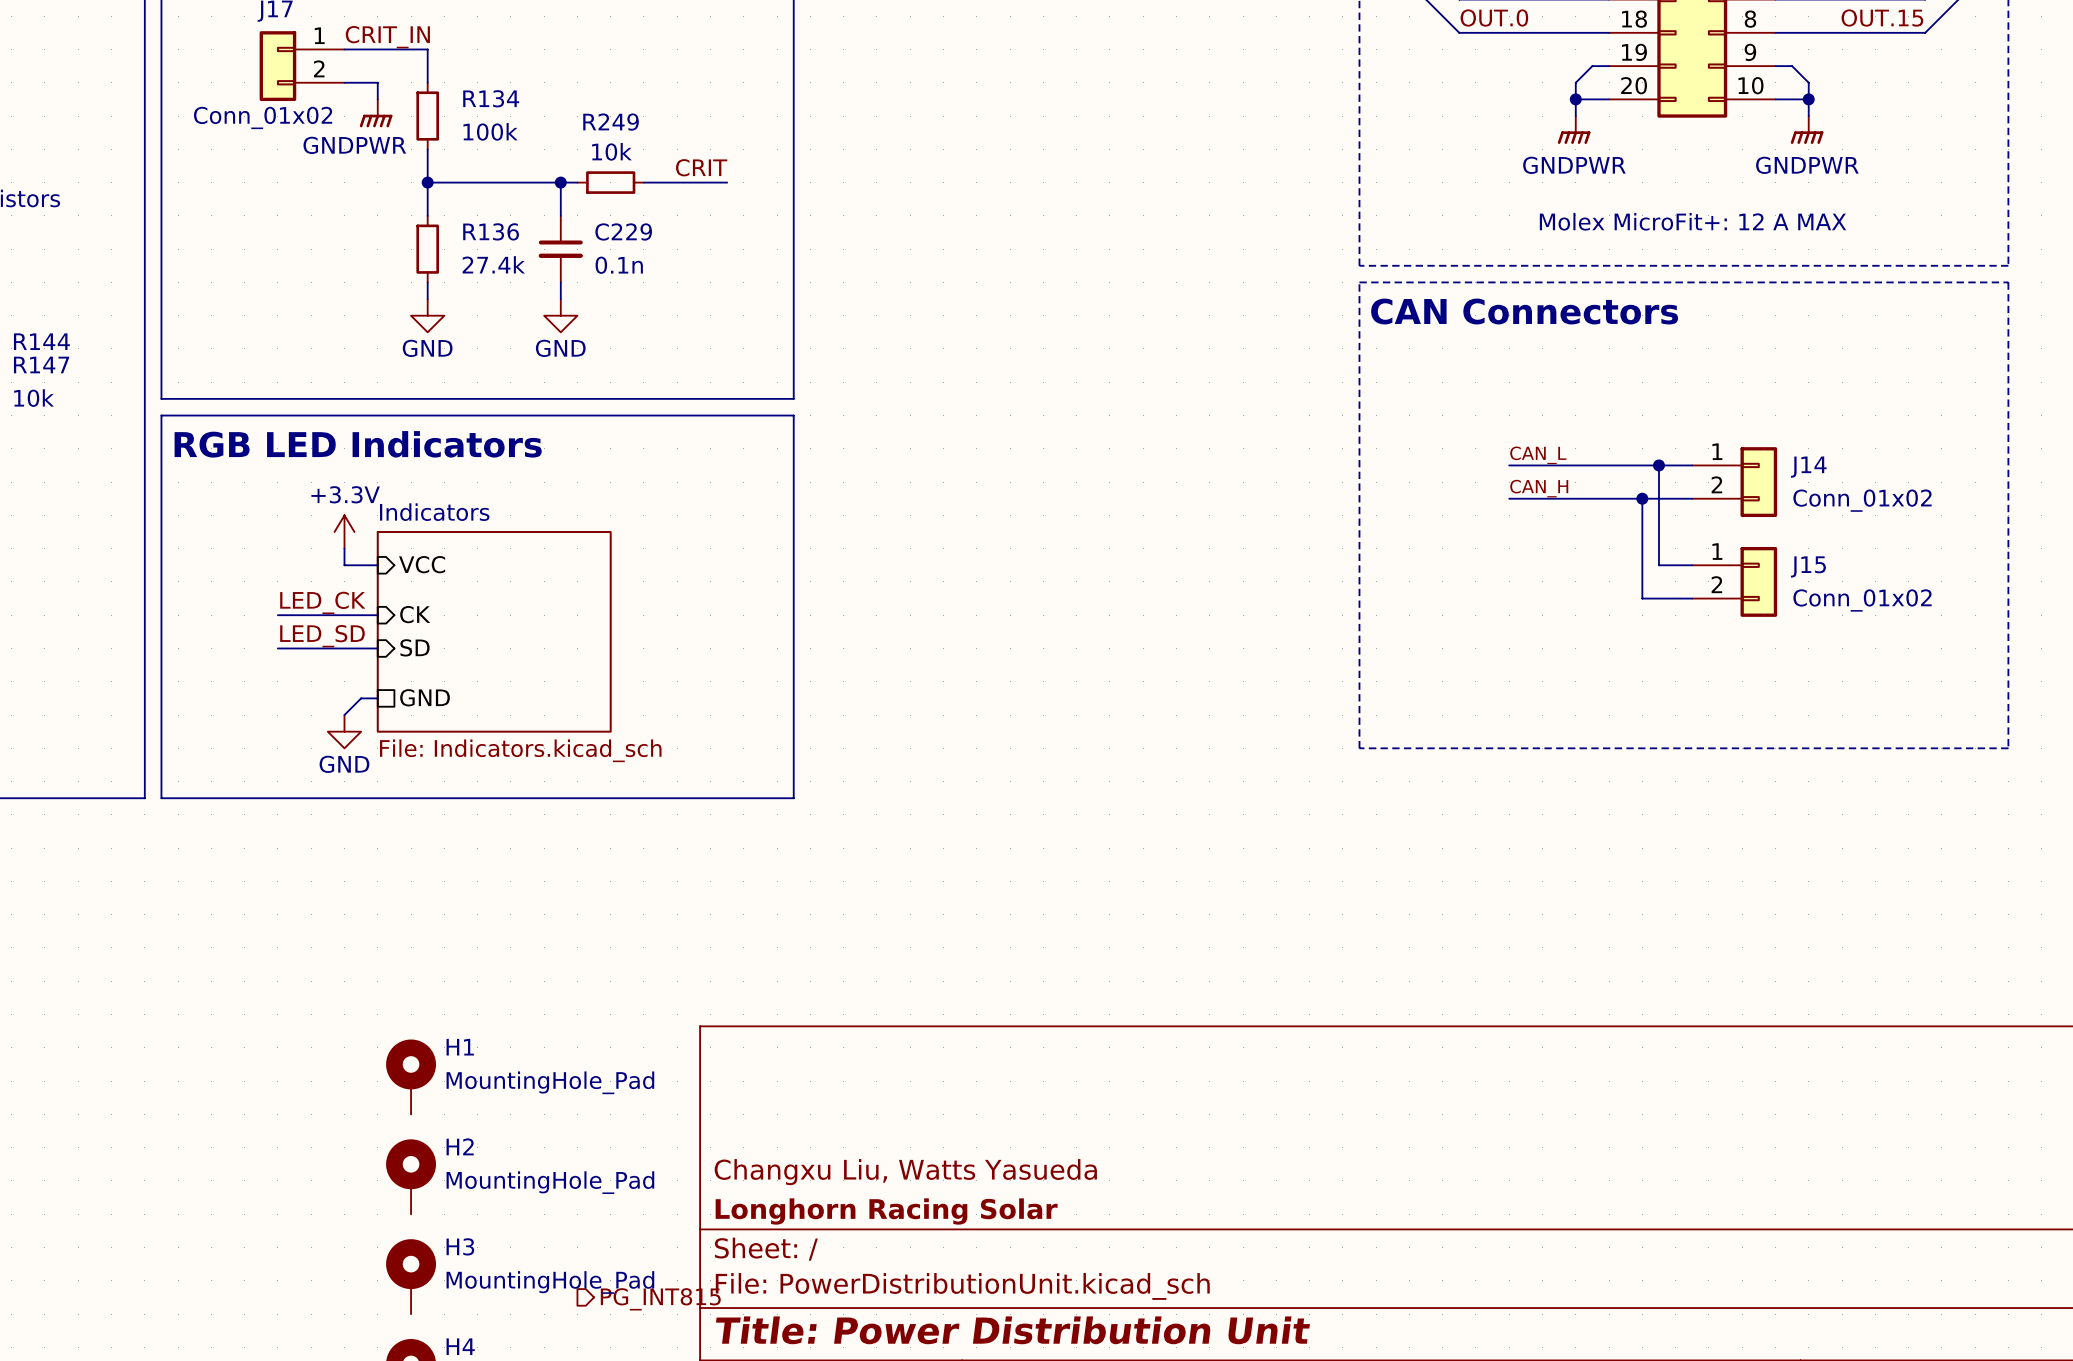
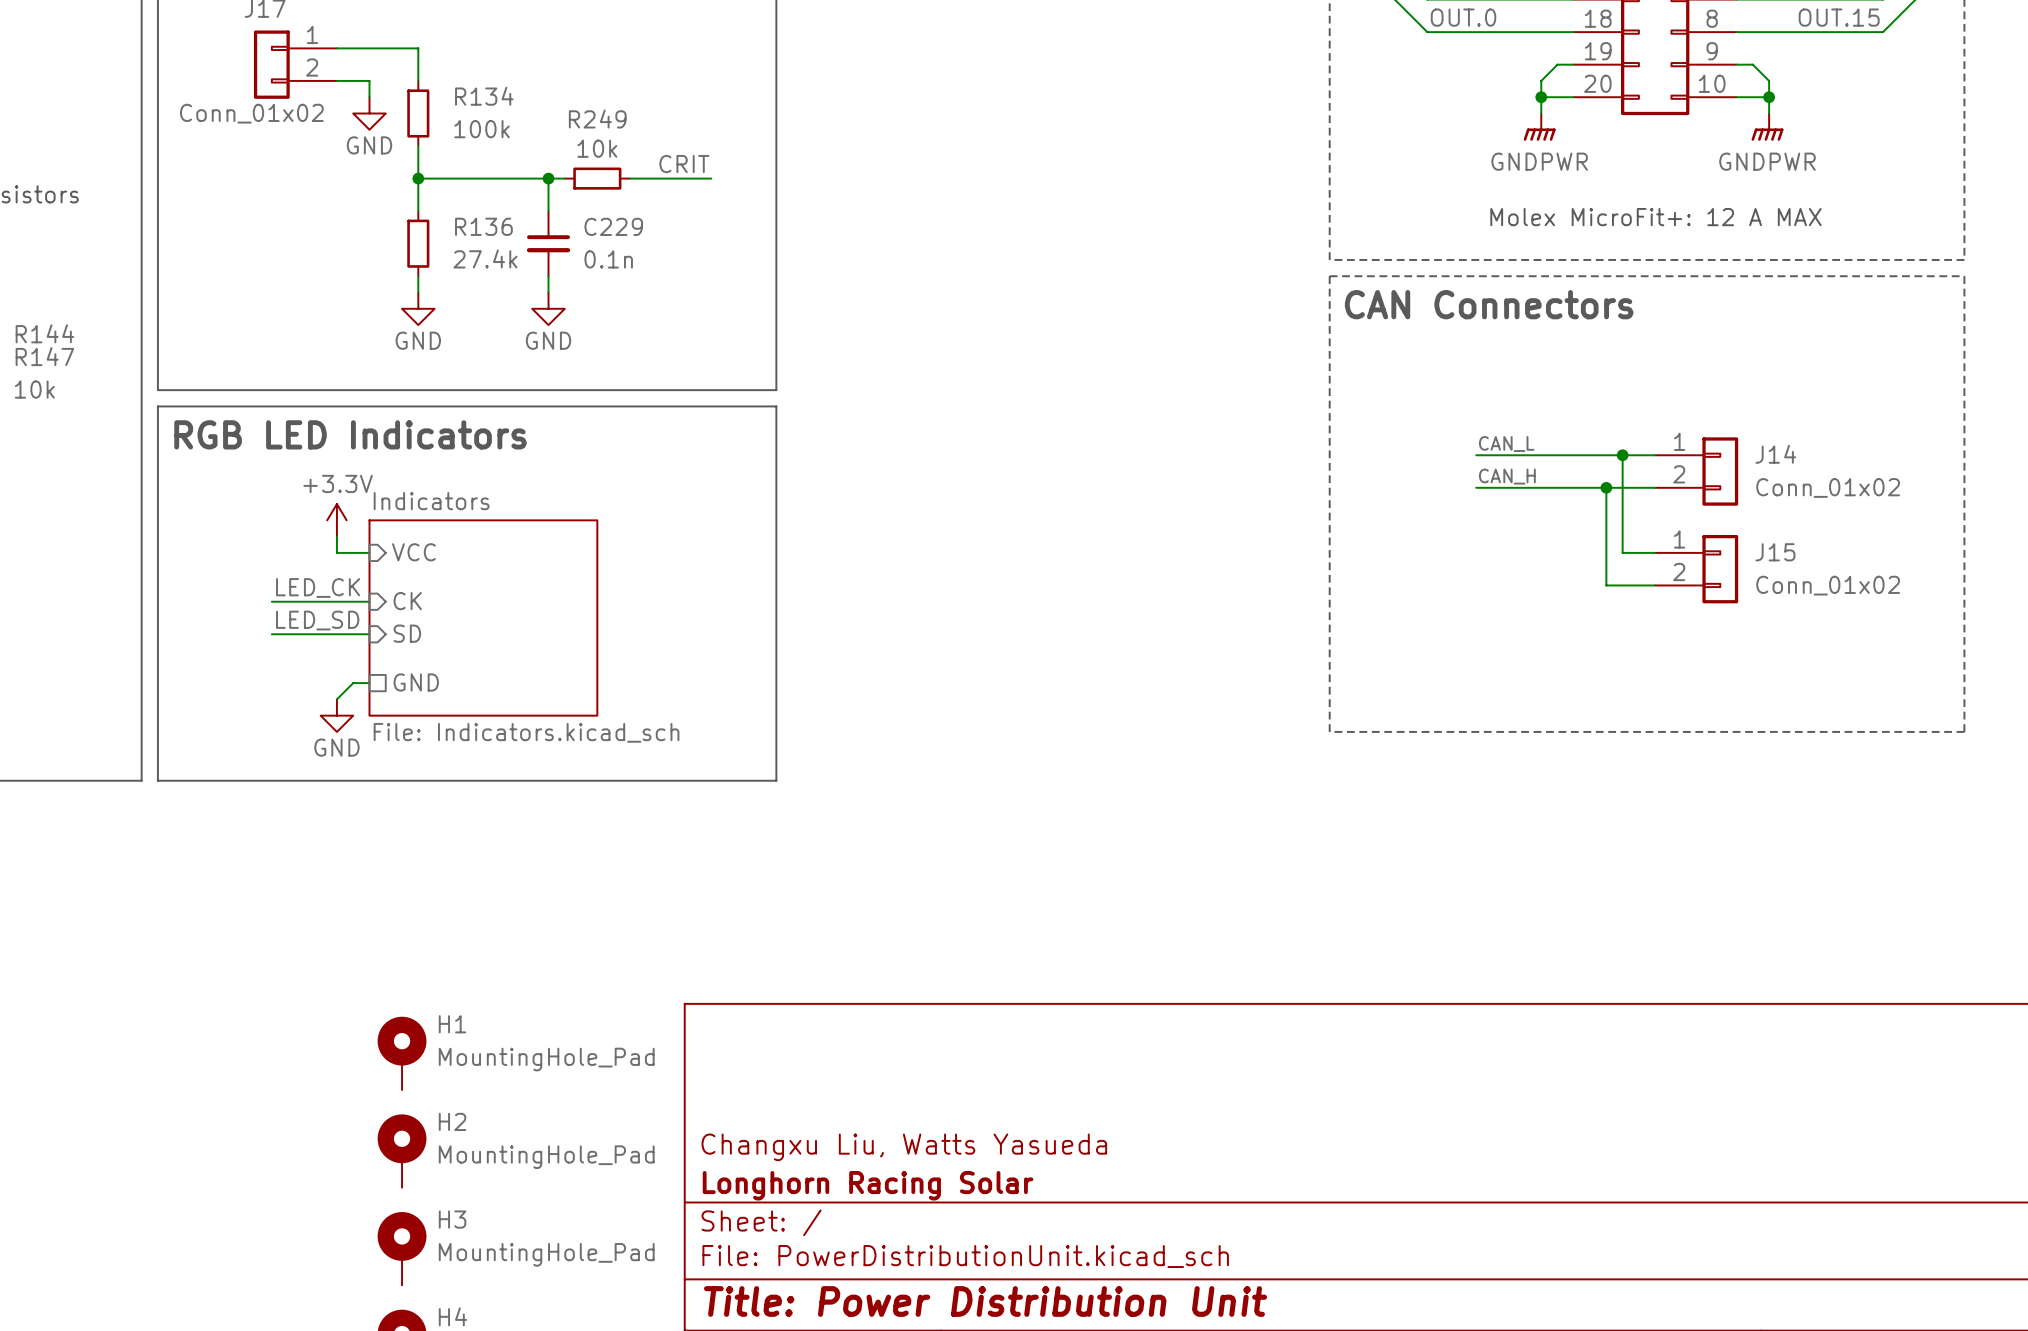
label: CRIT_IN (387, 37) -> none
power symbol: GNDPWR (376, 113) -> GND (369, 113)
hierarchical label: PG_INT815 (660, 1299) -> none

